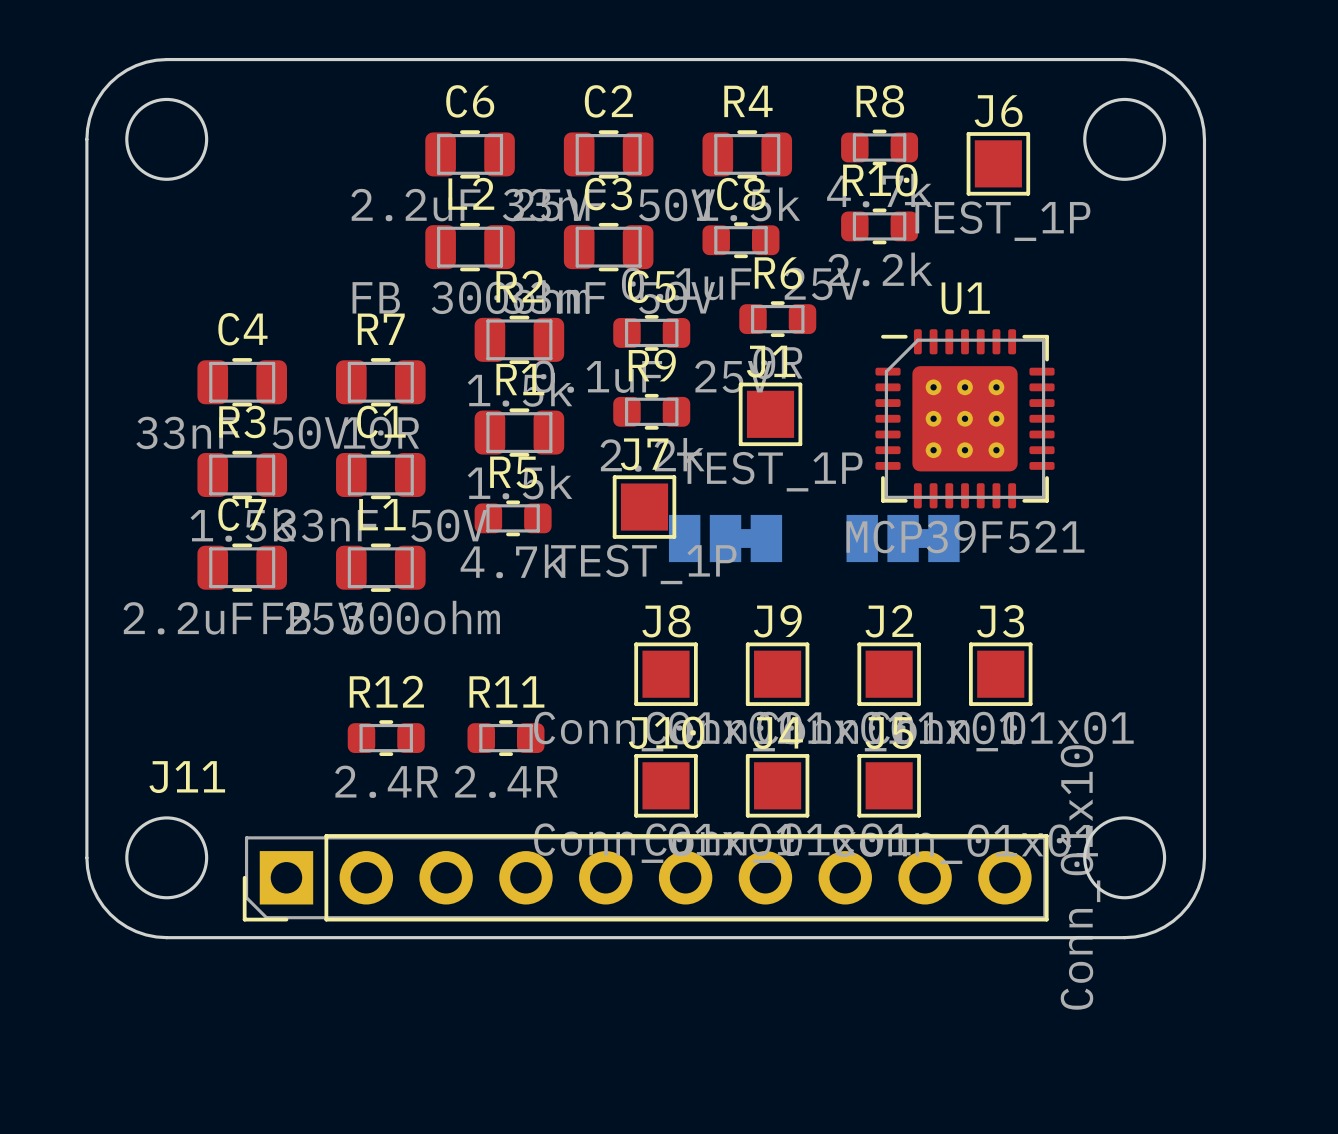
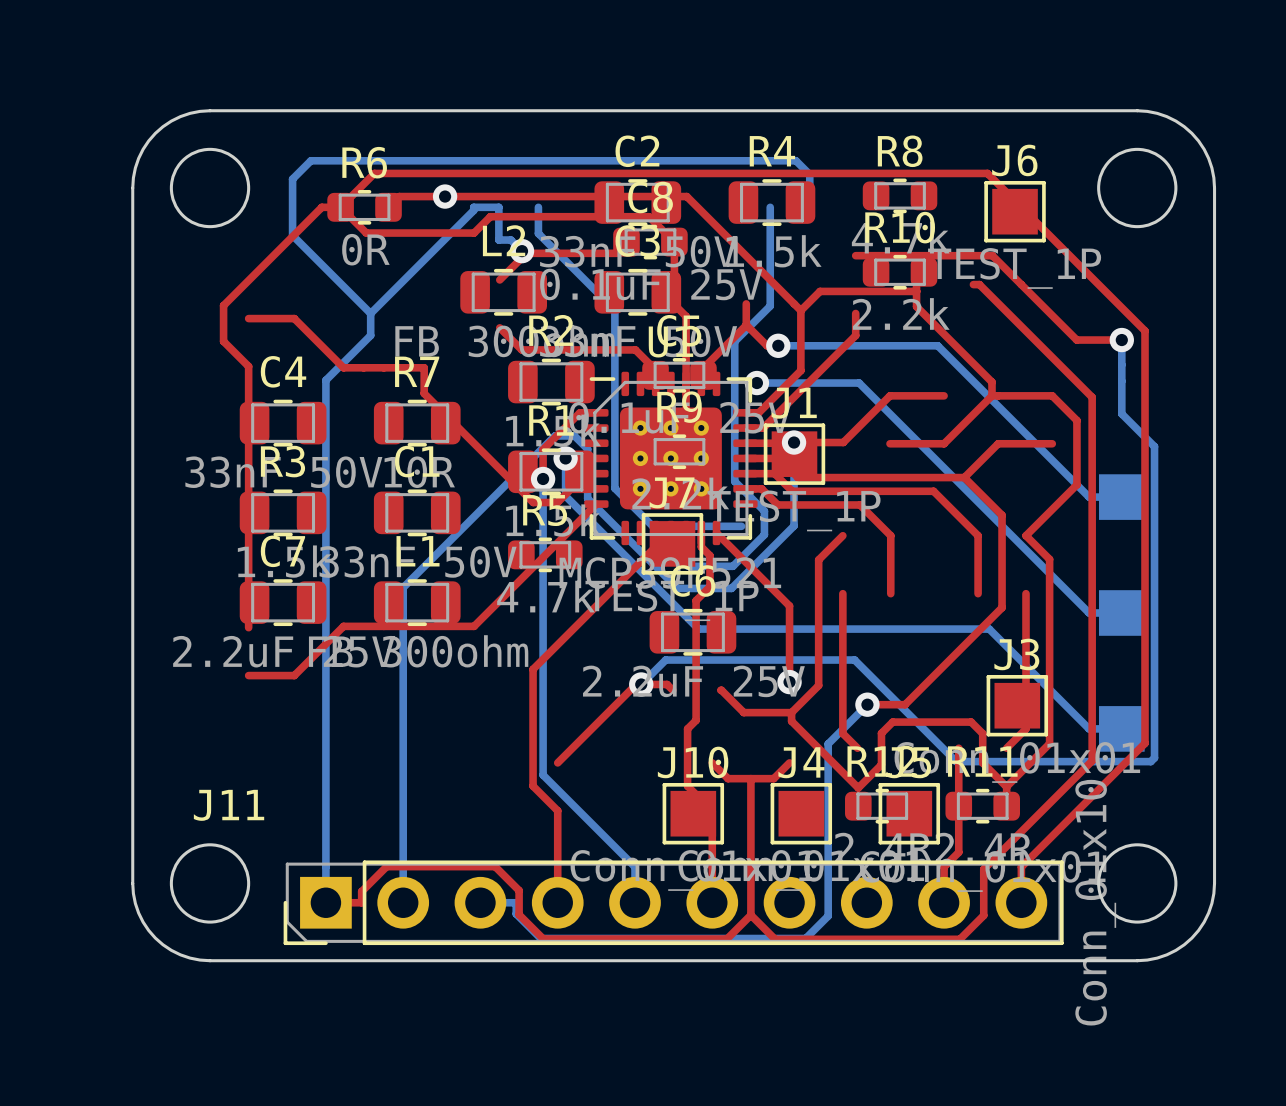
via: none -> (445, 196)
C6 position: (470, 154) -> (692, 632)
top track: none -> (340, 207) (366, 233) (474, 233) (490, 216) (649, 216) (674, 242) (673, 303) (686, 316) (686, 412)
top track: none -> (340, 207) (321, 207) (223, 305) (223, 341) (248, 366) (248, 627)
top track: none -> (340, 207) (374, 173) (987, 173) (1145, 330) (1145, 743) (1021, 867) (1021, 902)
top track: none -> (388, 207) (399, 196) (686, 196) (800, 310)
bottom track: none -> (538, 207) (538, 233) (614, 309) (614, 488) (652, 526) (741, 526)
bottom track: none -> (770, 207) (770, 306) (734, 341) (734, 481) (764, 511) (764, 534) (732, 566) (687, 566)
bottom track: none -> (809, 207) (809, 174) (795, 160) (310, 160) (292, 179) (292, 235) (370, 313)
top track: none -> (522, 251) (522, 257) (499, 279)
bottom track: none -> (522, 251) (510, 240) (498, 240) (498, 207) (473, 207) (473, 210) (370, 313)
via: none -> (522, 251)
top track: none -> (522, 253) (616, 253)
top track: none -> (855, 255) (992, 255) (1076, 340) (1121, 340)
top track: none -> (916, 284) (916, 306) (992, 382) (992, 395)
top track: none -> (973, 284) (979, 284) (1092, 397) (1092, 760) (983, 869) (983, 915) (959, 939) (775, 939) (750, 915)
C8 position: (740, 240) -> (650, 242)
top track: none -> (916, 291) (820, 291) (800, 310)
top track: none -> (746, 303) (746, 324) (767, 345) (778, 345)
top track: none -> (800, 310) (800, 370) (758, 412) (745, 412)
bottom track: none -> (370, 313) (370, 335) (325, 380) (325, 902)
top track: none -> (855, 313) (855, 335) (763, 428) (745, 428)
top track: none -> (248, 318) (294, 318) (343, 367) (424, 367) (424, 393) (533, 502) (557, 502) (571, 488) (596, 488)
top track: none -> (746, 325) (701, 370) (701, 383)
top track: none -> (499, 327) (521, 349) (635, 349) (655, 370) (655, 383)
bottom track: none -> (1121, 340) (1121, 413) (1154, 446) (1154, 757) (1150, 761) (956, 761) (854, 660) (665, 660) (641, 684)
via: none -> (1121, 340)
bottom track: none -> (778, 345) (937, 345) (1089, 497) (1121, 497)
via: none -> (778, 345)
R6 position: (777, 319) -> (364, 207)
bottom track: none -> (756, 383) (859, 383) (1089, 612) (1121, 612)
via: none -> (756, 383)
top track: none -> (944, 395) (890, 395) (843, 442) (745, 443)
top track: none -> (992, 395) (1052, 395) (1076, 420) (1076, 484) (1026, 535) (1049, 559) (1049, 743) (1006, 786)
top track: none -> (992, 395) (944, 443) (890, 443)
top track: none -> (596, 412) (579, 412) (543, 449) (543, 478)
bottom track: none -> (794, 442) (794, 525) (731, 588) (677, 588) (587, 498) (587, 449) (574, 435) (554, 435) (403, 587) (403, 902)
via: none -> (794, 442)
top track: none -> (1052, 443) (998, 443) (964, 477)
bottom track: none -> (565, 458) (565, 496) (698, 629) (989, 629) (1089, 728) (1121, 728)
via: none -> (565, 458)
top track: none -> (745, 458) (778, 458) (797, 477) (964, 477)
U1 position: (965, 418) -> (670, 458)
top track: none -> (745, 473) (774, 473) (792, 491) (933, 491) (978, 535) (978, 593)
top track: none -> (964, 477) (1002, 515) (1002, 607) (905, 704) (867, 704)
bottom track: none -> (543, 478) (543, 775) (635, 867) (635, 902)
via: none -> (543, 478)
top track: none -> (745, 488) (761, 488) (777, 504) (860, 504) (890, 535) (890, 593)
top track: none -> (596, 504) (474, 626) (343, 626) (294, 675) (248, 675)
top track: none -> (655, 532) (655, 546) (533, 669) (533, 786) (557, 810) (557, 902)
top track: none -> (701, 532) (701, 546) (709, 555) (709, 586) (696, 600) (696, 720) (687, 728) (687, 786) (712, 810) (712, 902)
top track: none -> (716, 532) (789, 606) (789, 682)
top track: none -> (842, 535) (818, 559) (818, 685) (791, 712)
part: (725, 538) -> none
part: (903, 538) -> none
top track: none -> (842, 593) (842, 733) (857, 748)
top track: none -> (1026, 593) (1026, 728) (1006, 748)
via: none -> (789, 682)
via: none -> (641, 684)
top track: none -> (672, 690) (667, 684) (636, 684) (557, 762)
top track: none -> (720, 690) (743, 712) (791, 712)
bottom track: none -> (867, 704) (828, 743) (828, 916) (805, 938) (540, 938) (516, 913) (516, 902) (480, 902)
via: none -> (867, 704)
J8 side: top (666, 674) -> bottom (1121, 612)
J9 side: top (777, 674) -> bottom (1121, 728)
J2 side: top (889, 674) -> bottom (1121, 497)
top track: none -> (791, 712) (791, 721) (858, 787) (881, 764) (881, 733) (892, 722) (971, 722) (982, 733) (982, 762) (1006, 786) (1006, 806)
top track: none -> (958, 748) (958, 852) (944, 867) (944, 902)
top track: none -> (712, 762) (728, 778) (773, 778) (789, 762)
R12 position: (386, 738) -> (882, 806)
R11 position: (505, 738) -> (982, 806)
top track: none -> (750, 778) (750, 915)
top track: none -> (325, 902) (361, 902) (361, 891) (386, 866) (495, 866) (519, 890) (519, 914) (543, 938) (727, 938) (750, 915)

